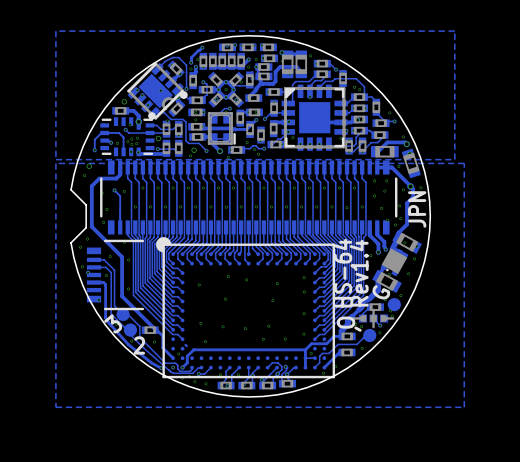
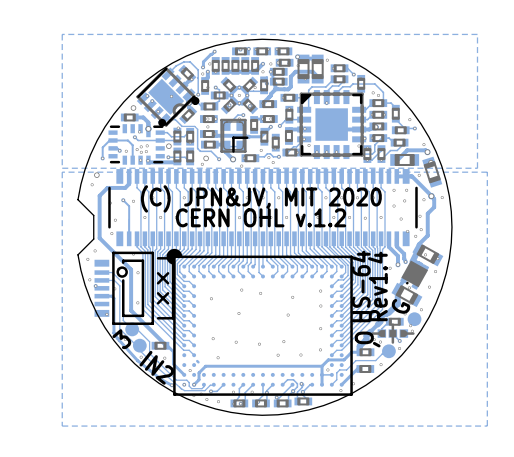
part footprint: [207, 112, 236, 145] -> [220, 118, 249, 153]
text: none -> (C) JPN&JV, MIT 2020 (261, 198)
text: none -> CERN OHL v.1.2 (261, 217)
text: JPN (417, 209) -> none
part footprint: [86, 239, 145, 311] -> [94, 251, 175, 325]
text: 2 (139, 345) -> IN2 (156, 367)

